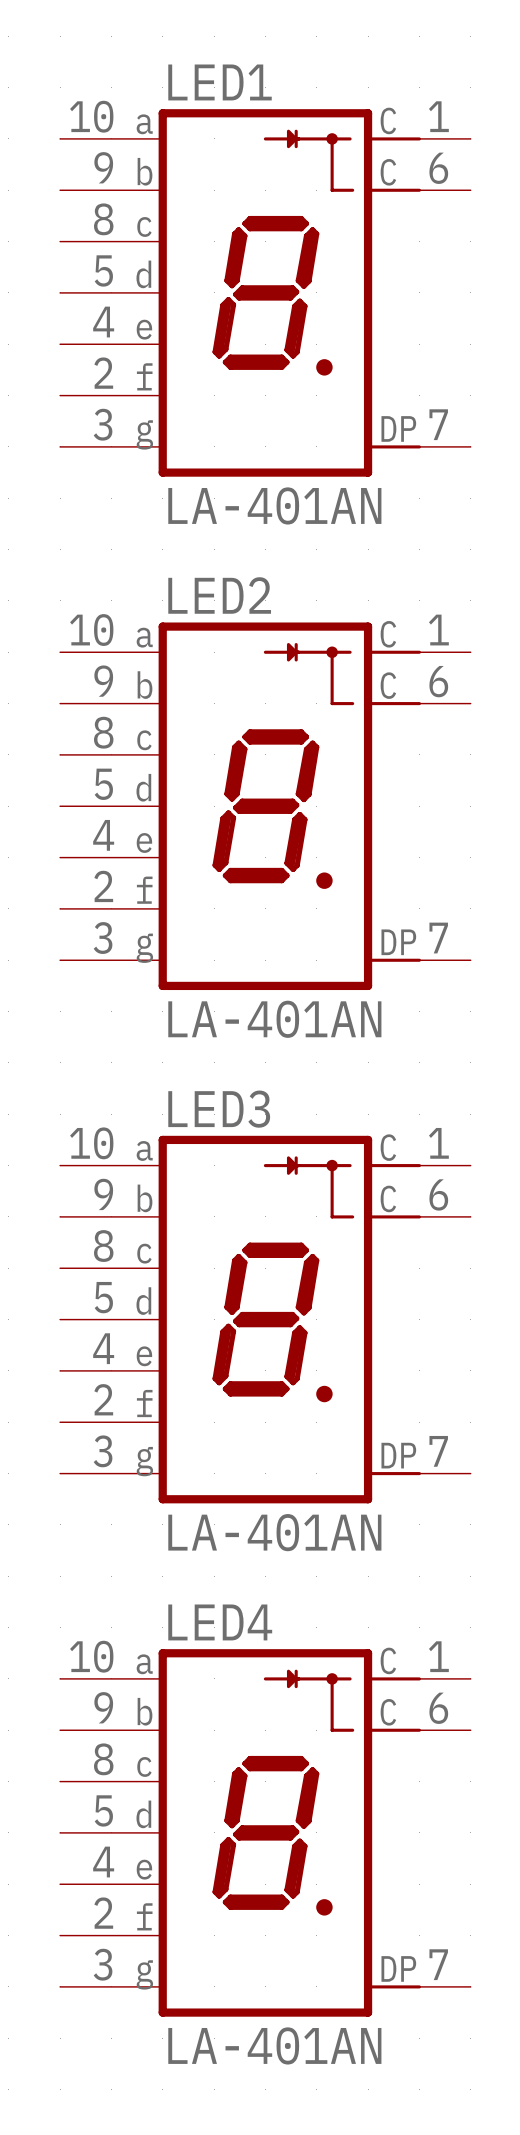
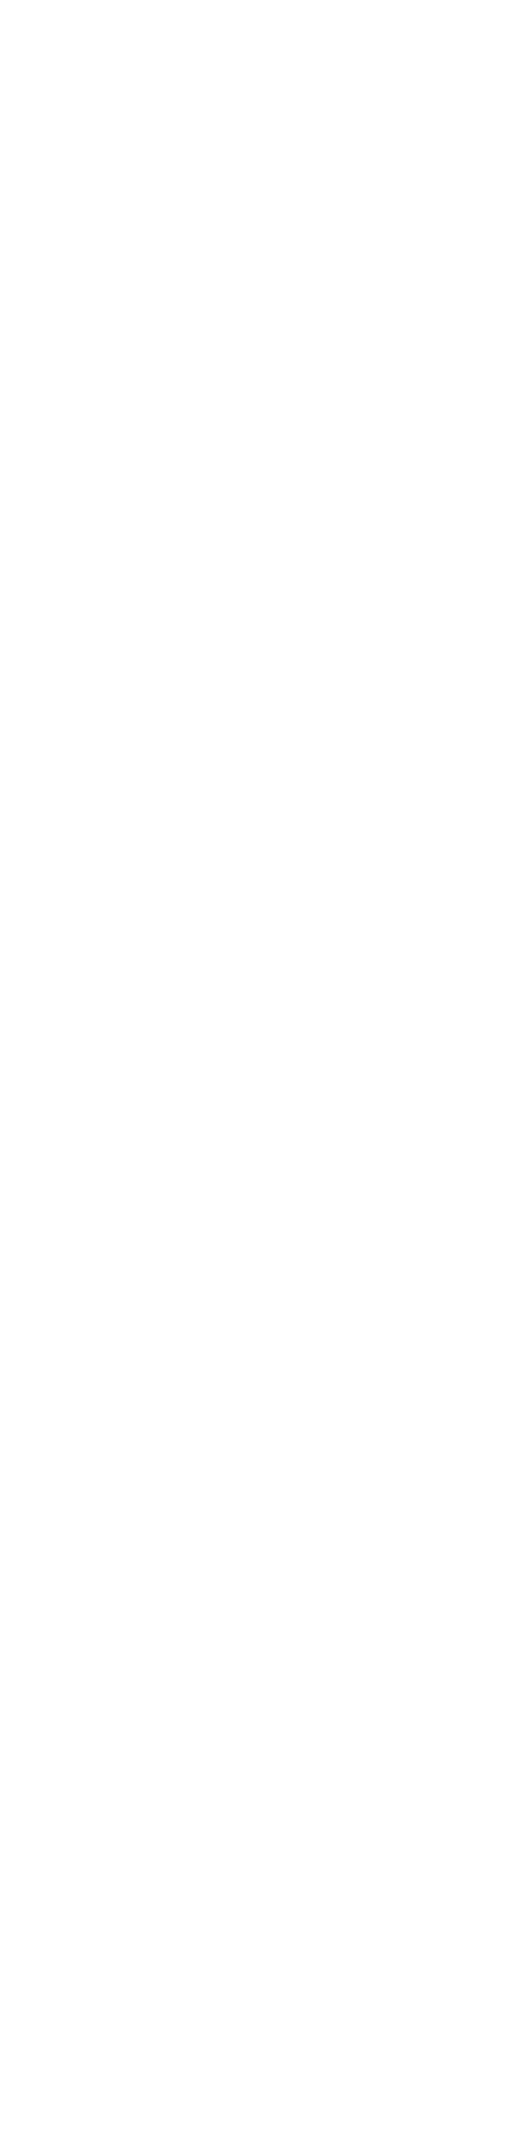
LED1: LA-401AN (265, 292) -> none
LED2: LA-401AN (265, 806) -> none
LED3: LA-401AN (265, 1319) -> none
LED4: LA-401AN (265, 1832) -> none

